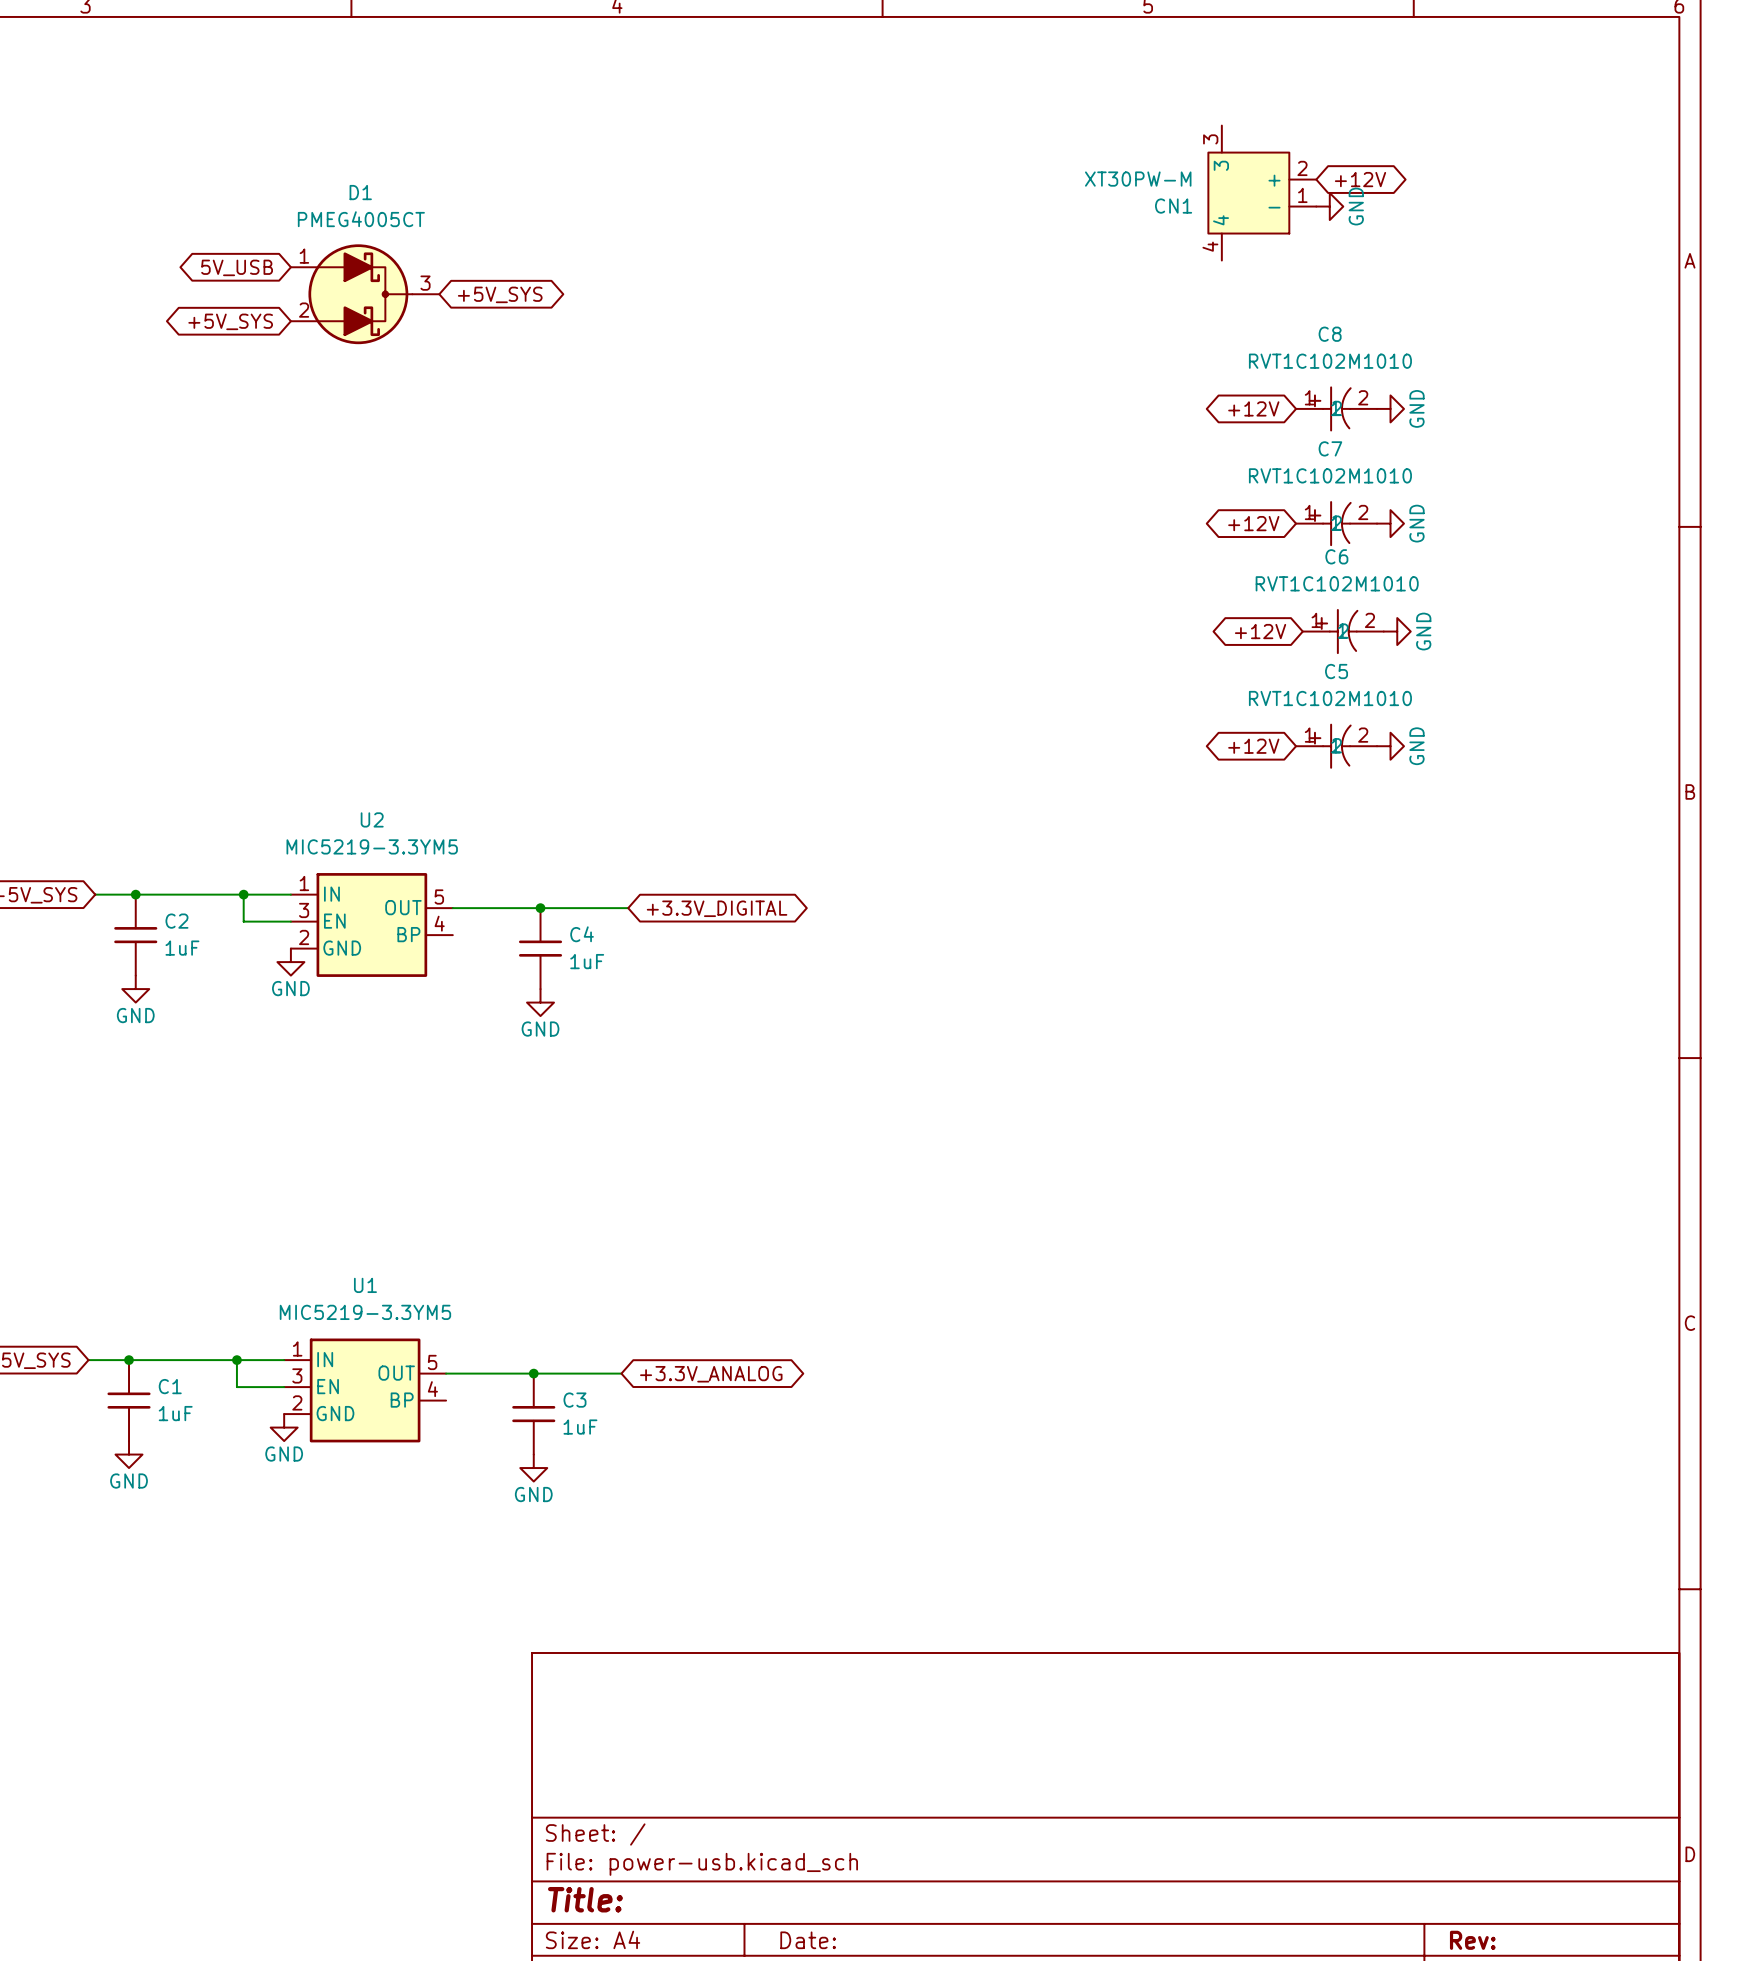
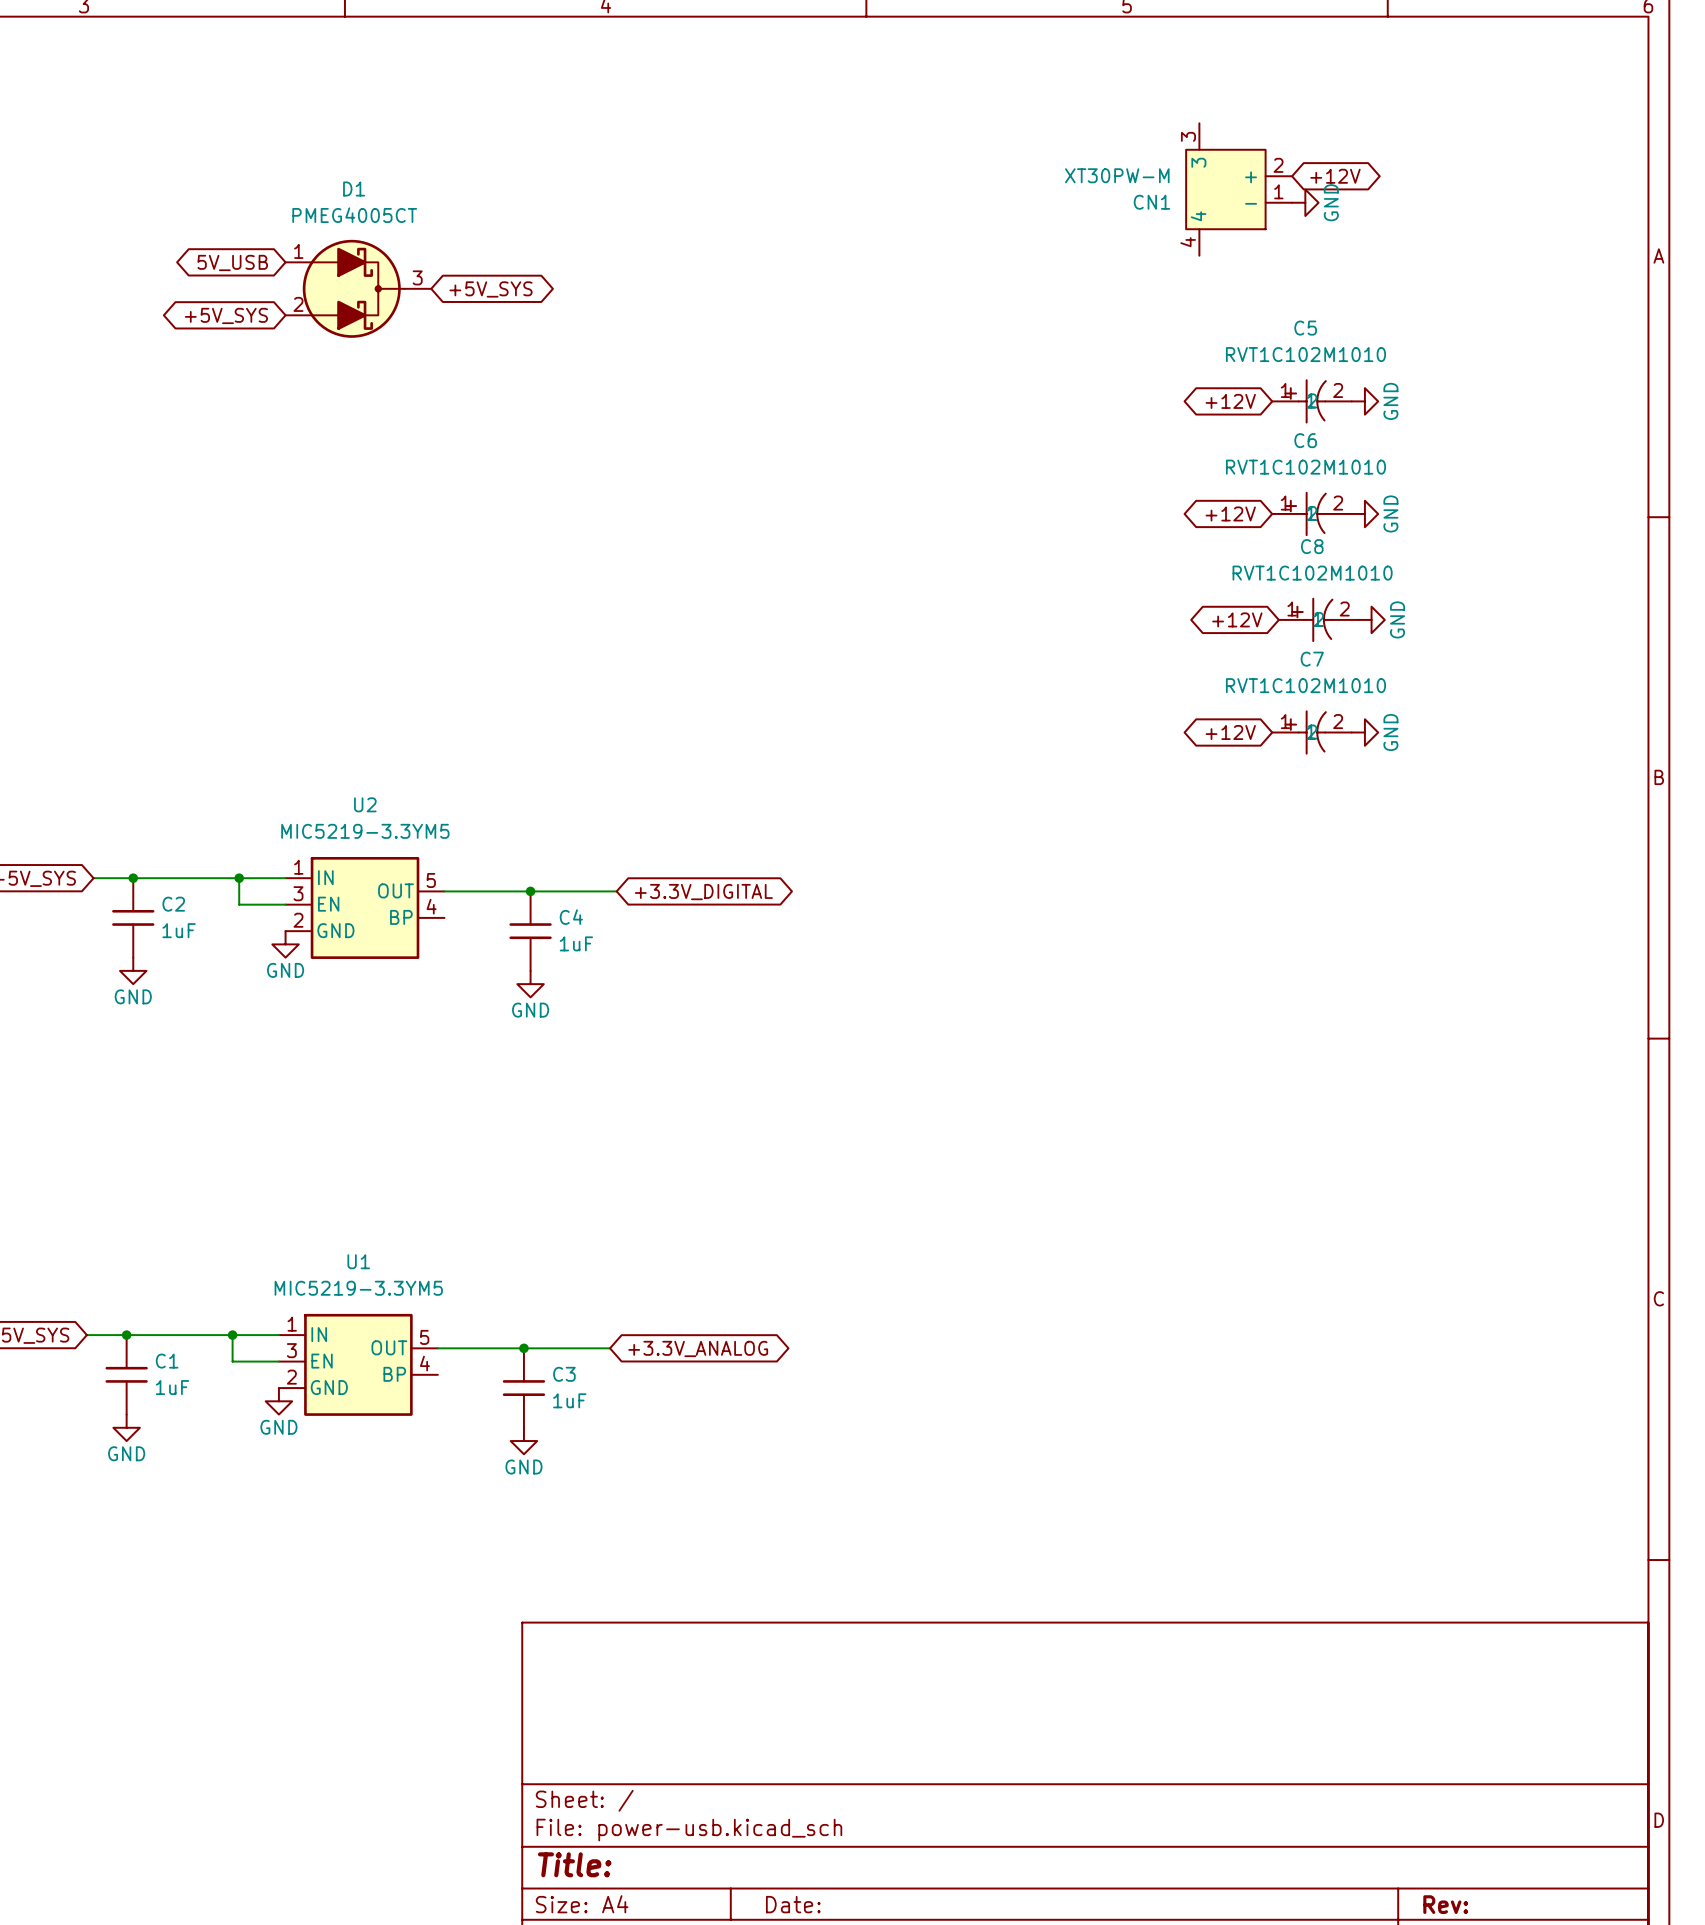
C8 name: C8 (1330, 334) -> C5 (1305, 328)
C7 name: C7 (1330, 448) -> C6 (1305, 440)
C6 name: C6 (1336, 556) -> C8 (1312, 546)
C5 name: C5 (1336, 671) -> C7 (1312, 659)

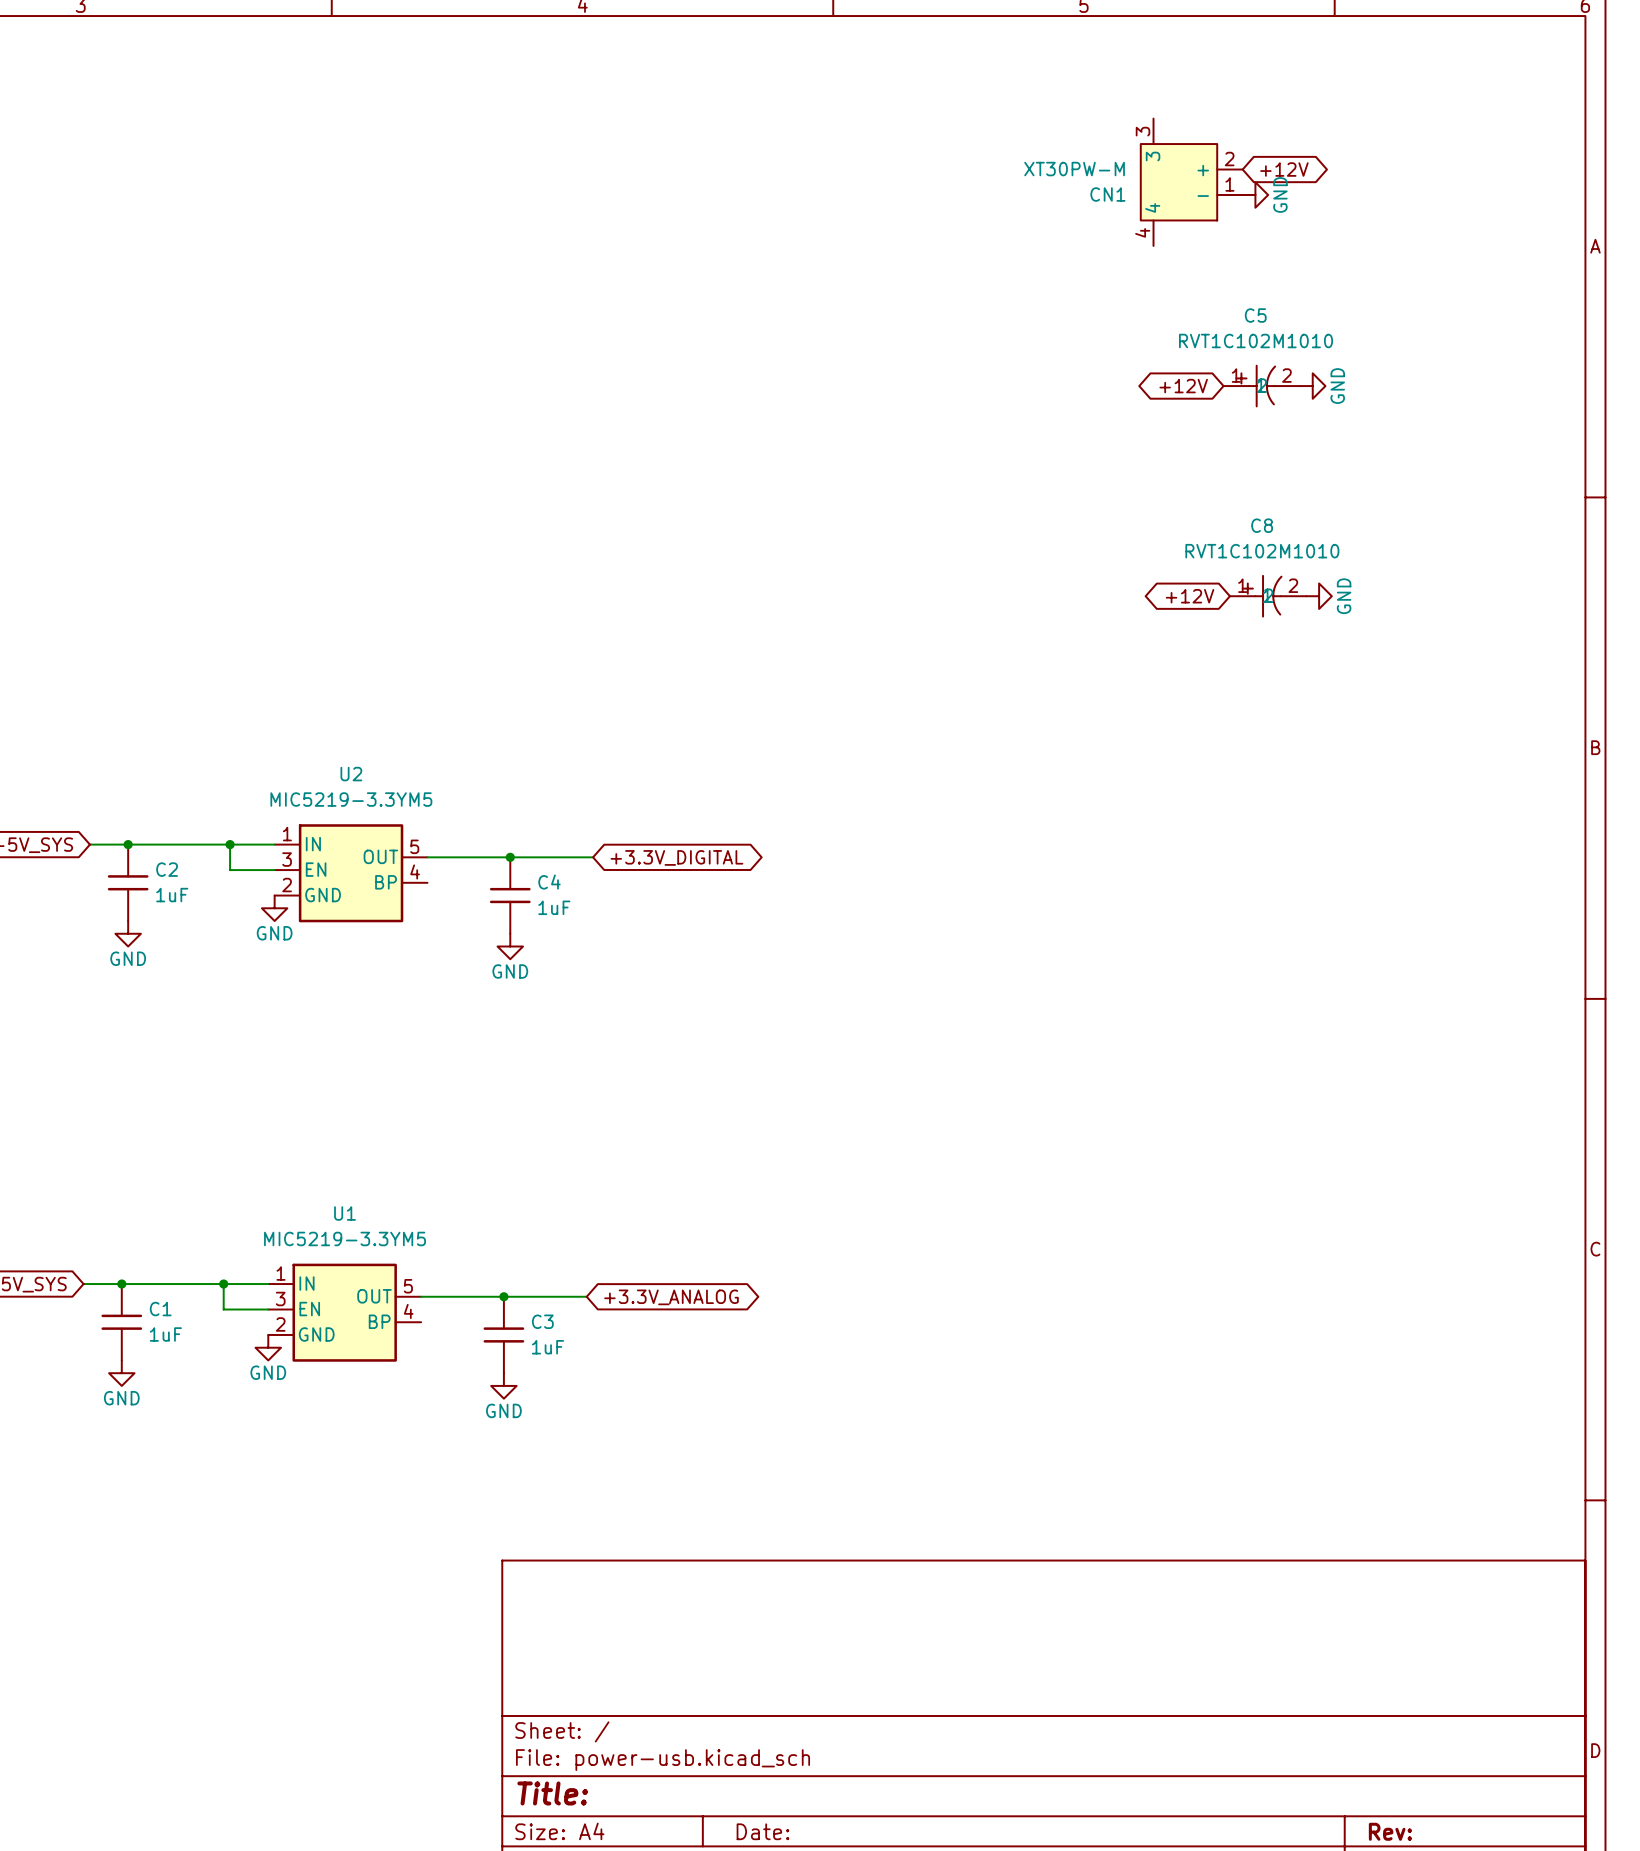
global label: 5V_USB (232, 262) -> none
D1: PMEG4005CT (358, 288) -> none
global label: +5V_SYS (491, 289) -> none
global label: +5V_SYS (226, 315) -> none
global label: +12V (1230, 513) -> none
C6: RVT1C102M1010 (1311, 513) -> none
power symbol: GND (1364, 513) -> none
global label: +12V (1230, 732) -> none
C7: RVT1C102M1010 (1311, 732) -> none
power symbol: GND (1364, 732) -> none

